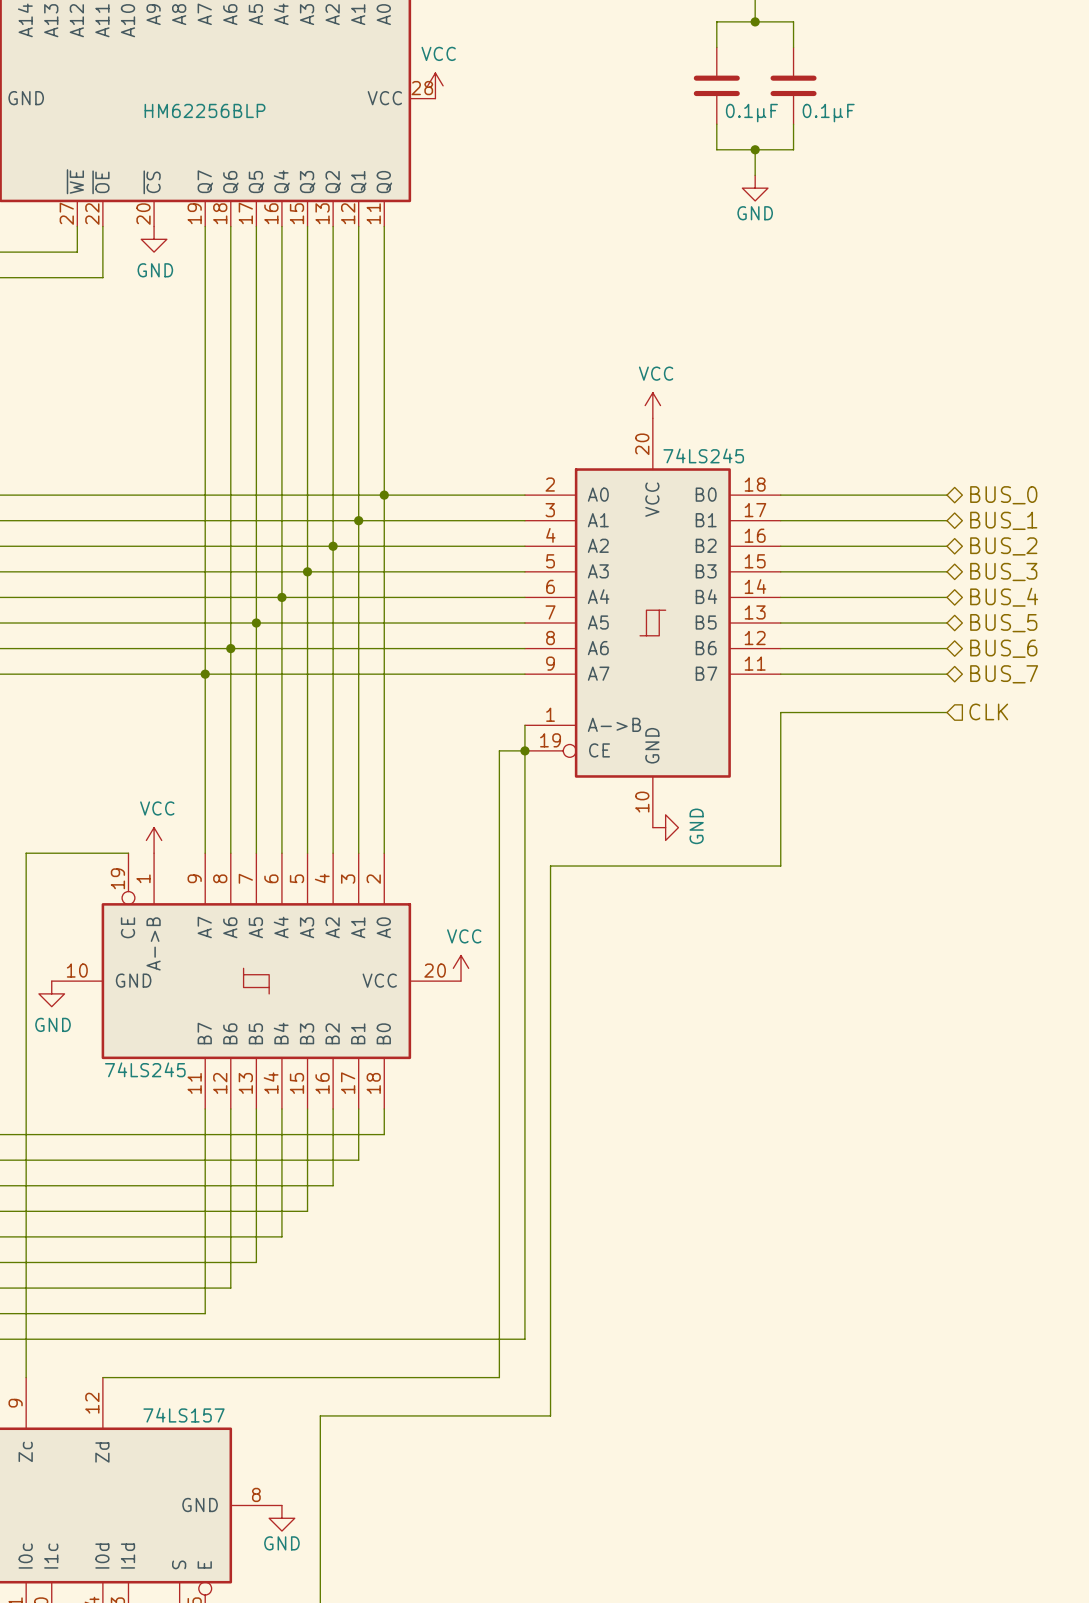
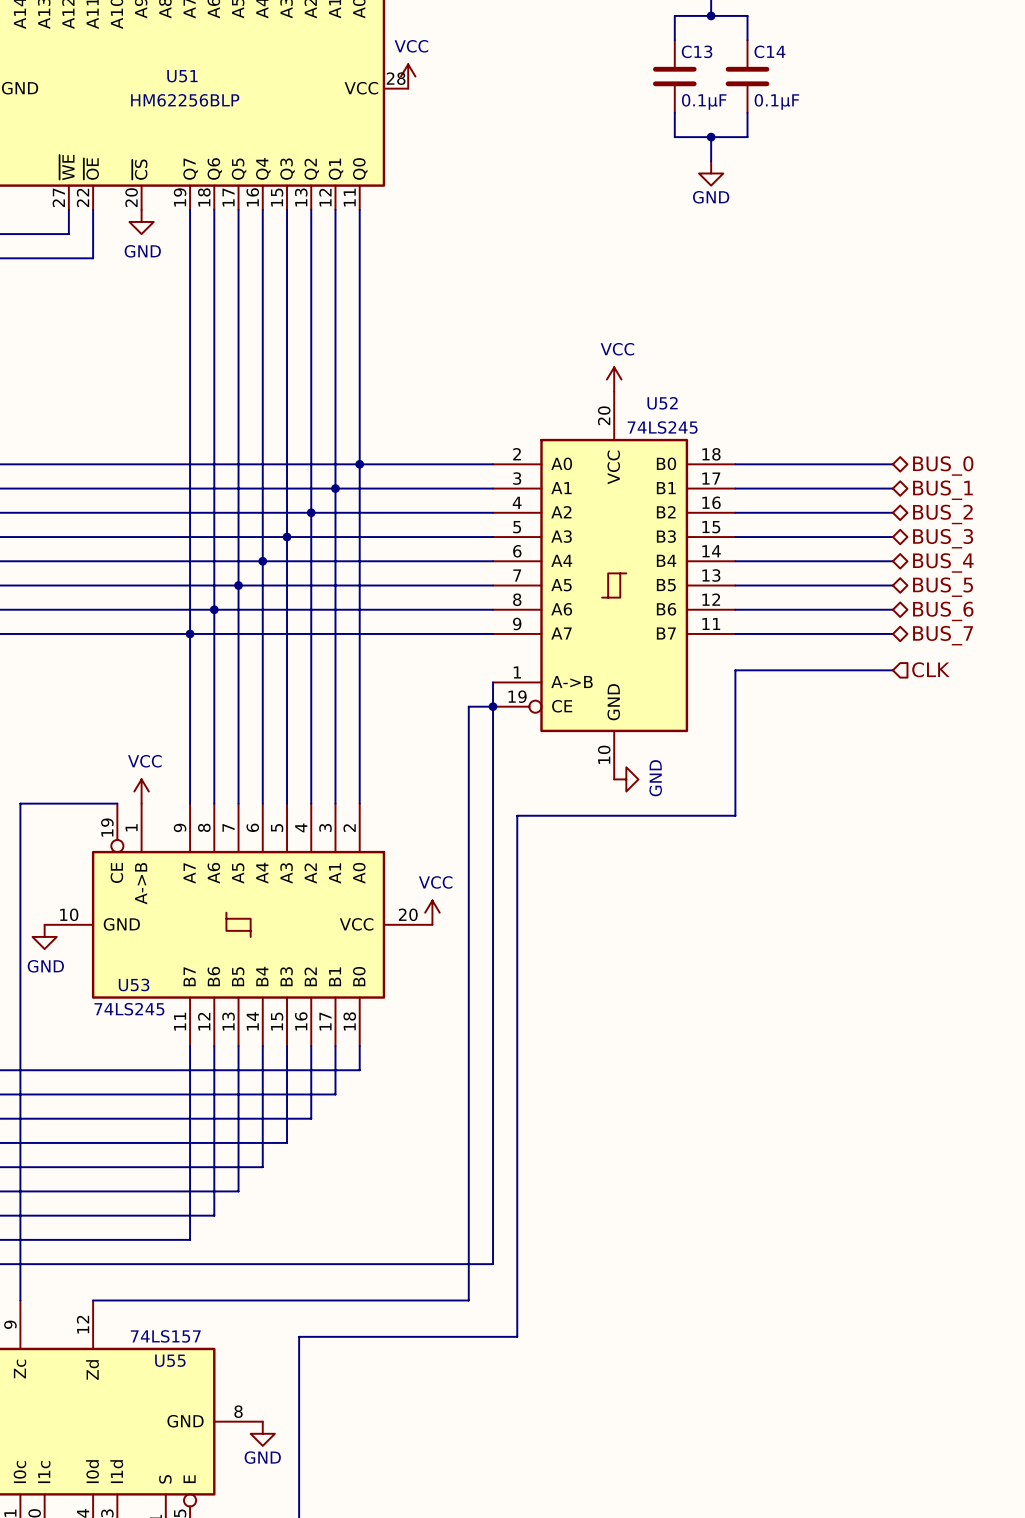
C13 name: none -> C13 (697, 51)
C14 name: none -> C14 (769, 51)
U51 name: none -> U51 (182, 76)
U52 name: none -> U52 (662, 403)
U53 name: none -> U53 (134, 984)
U55 name: none -> U55 (170, 1360)

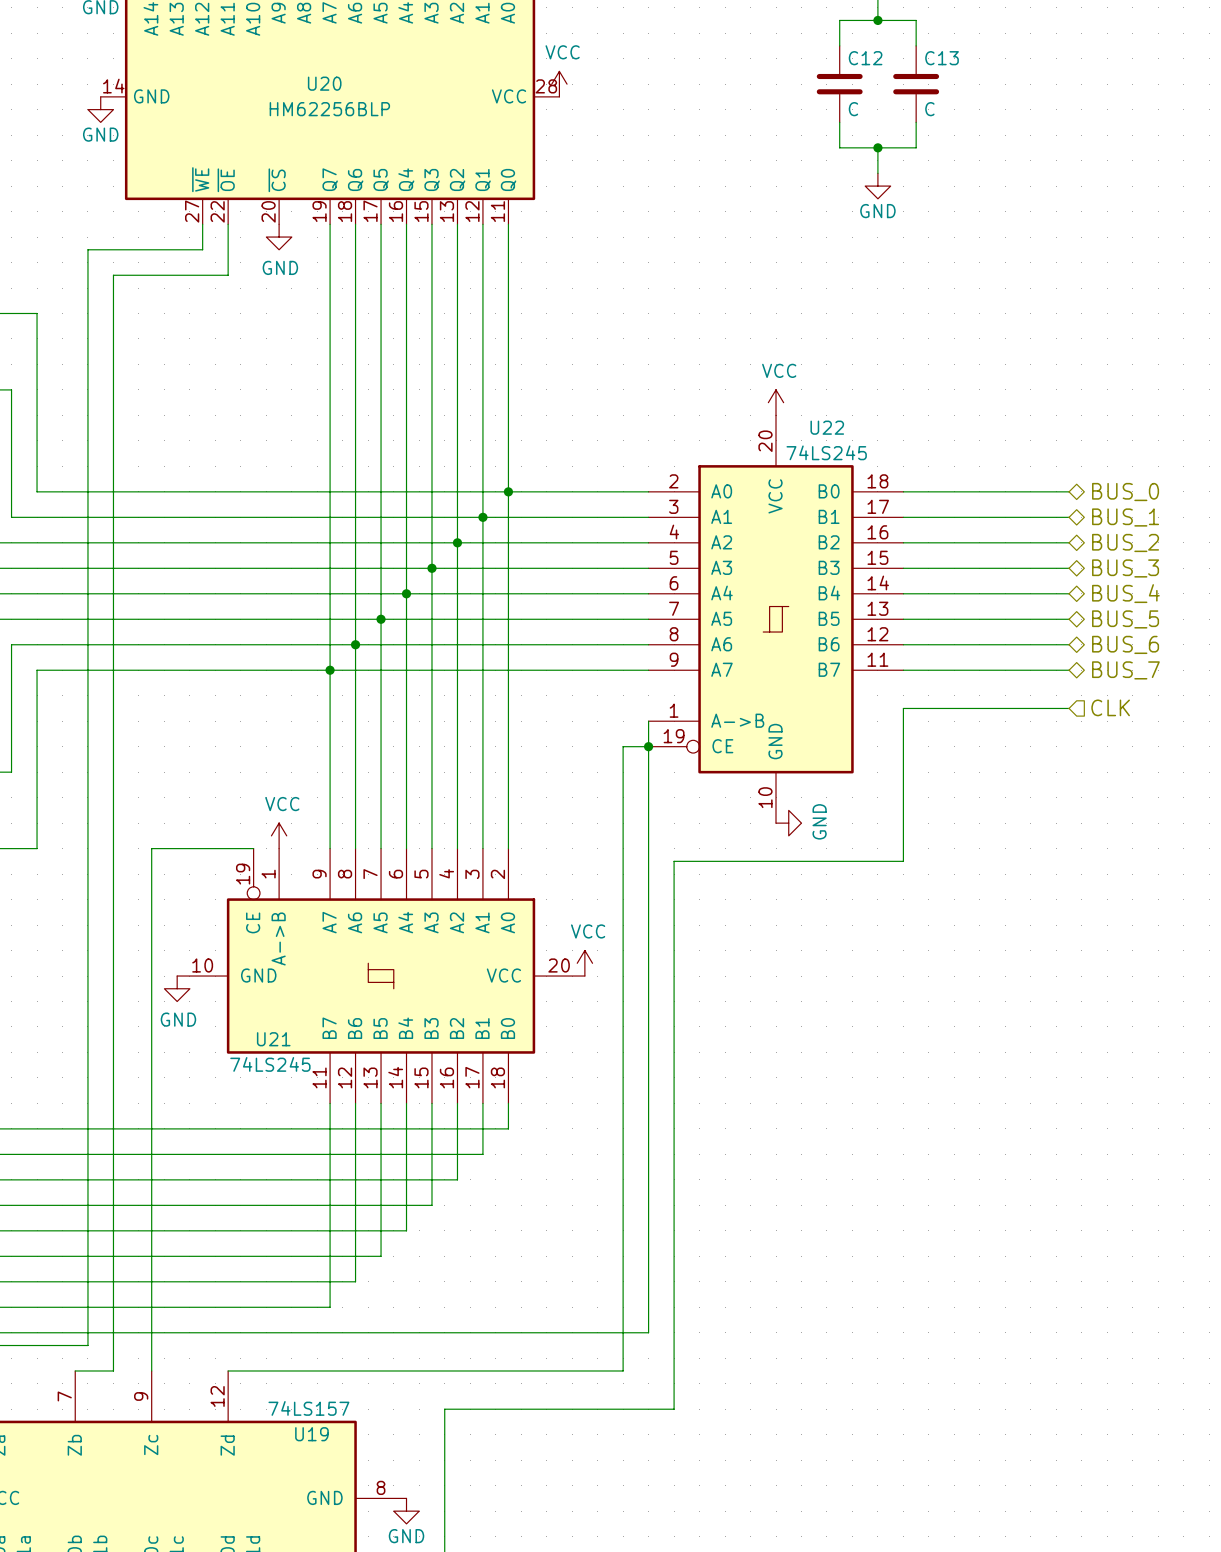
C13 name: C13 (697, 51) -> C12 (865, 58)
C14 name: C14 (769, 51) -> C13 (942, 58)
U51 name: U51 (182, 76) -> U20 (324, 83)
C13 value: 0.1µF (704, 101) -> C (853, 109)
C14 value: 0.1µF (776, 101) -> C (929, 109)
U52 name: U52 (662, 403) -> U22 (827, 427)
U53 name: U53 (134, 984) -> U21 (273, 1039)
U55 name: U55 (170, 1360) -> U19 (311, 1434)

